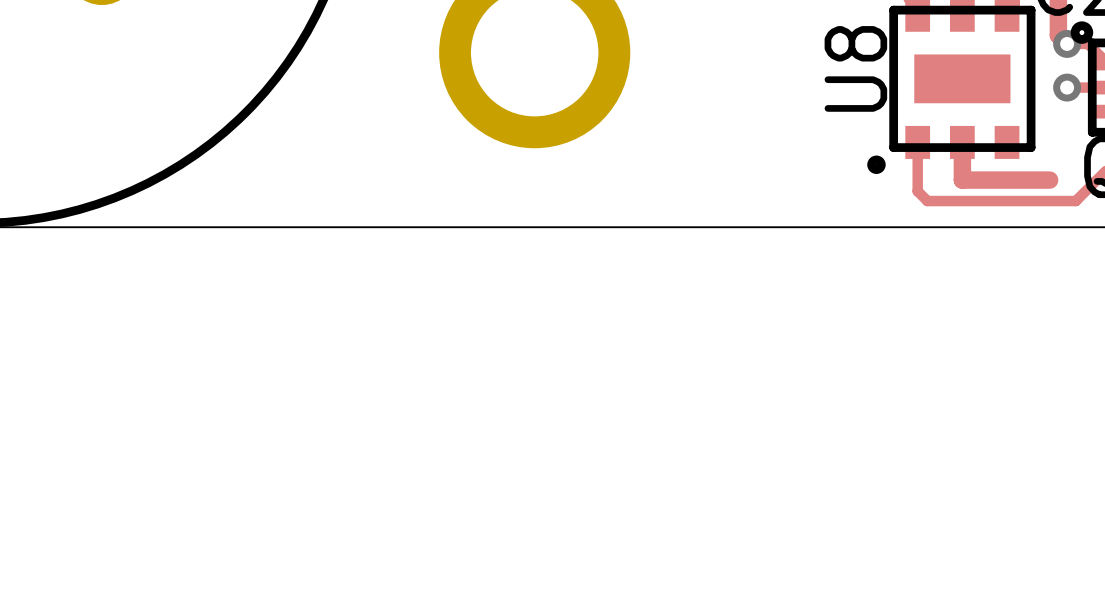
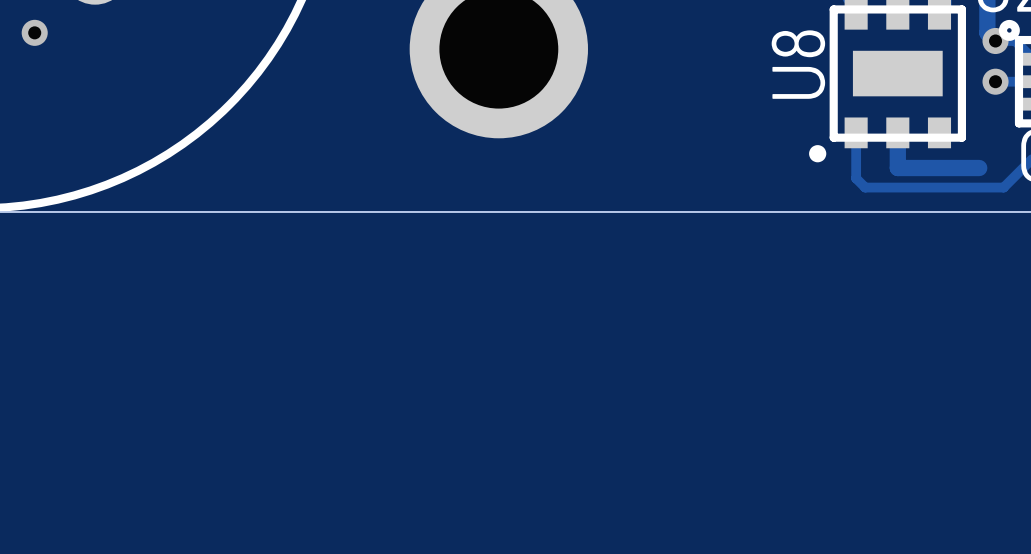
via: none -> (34, 32)

